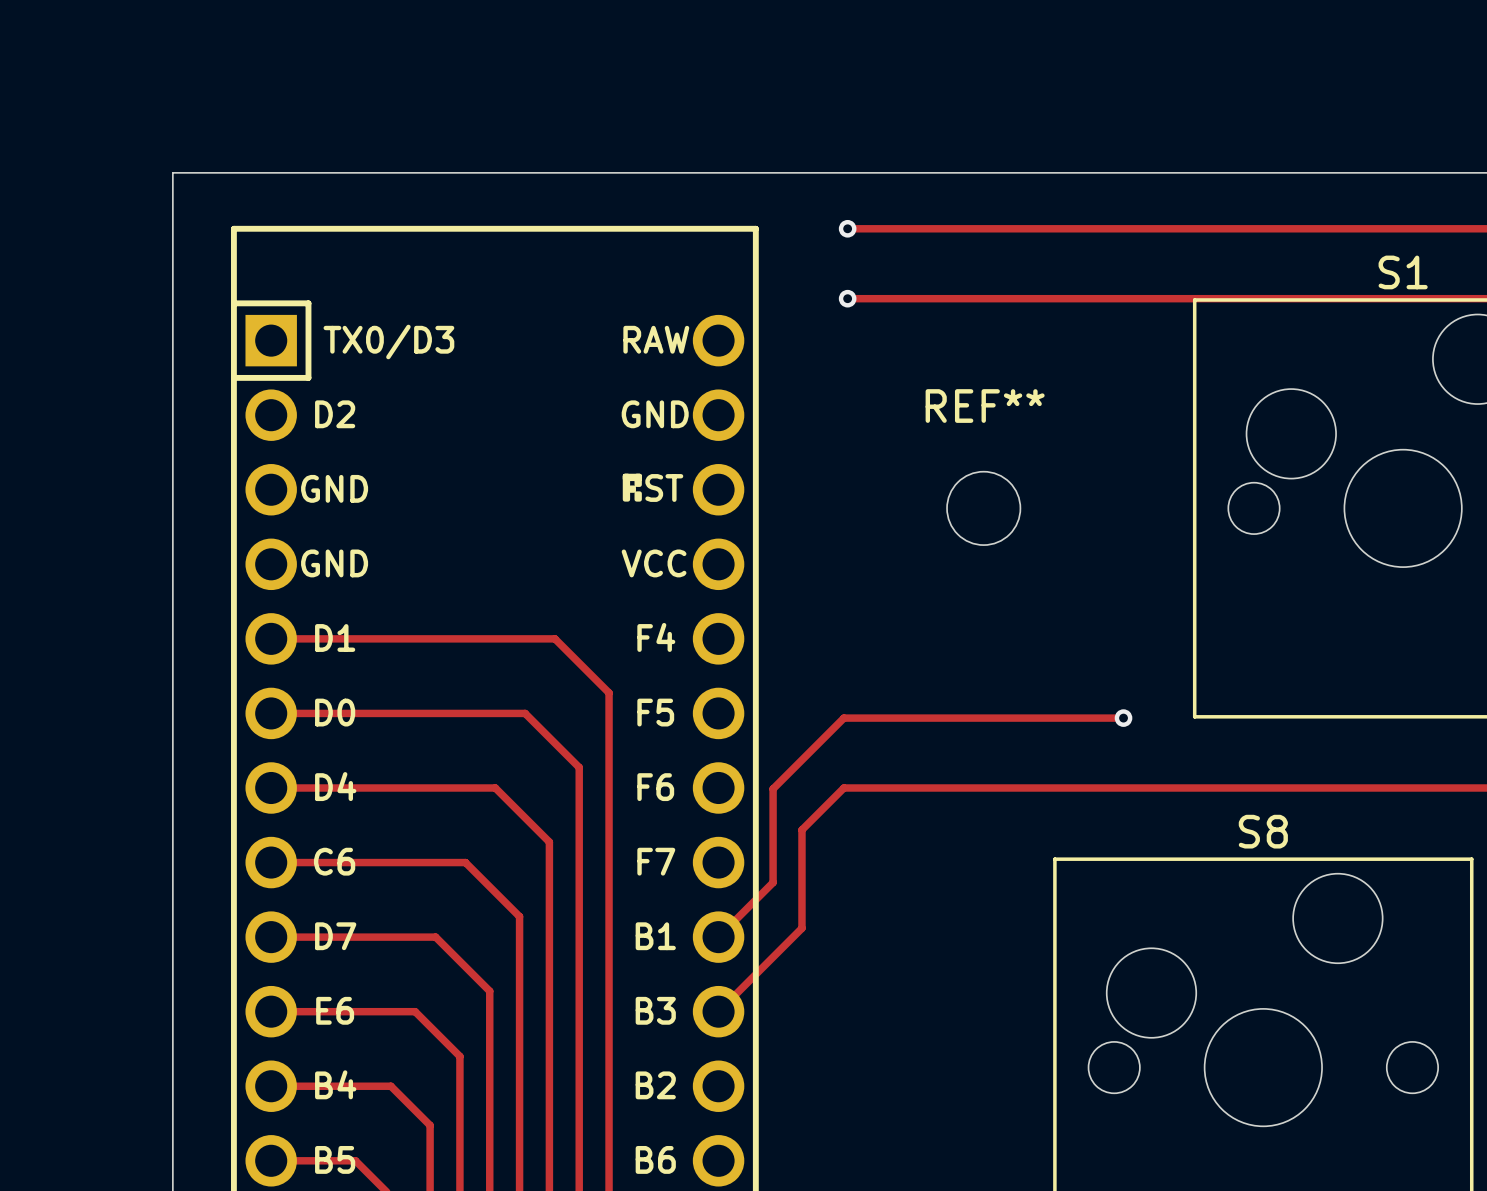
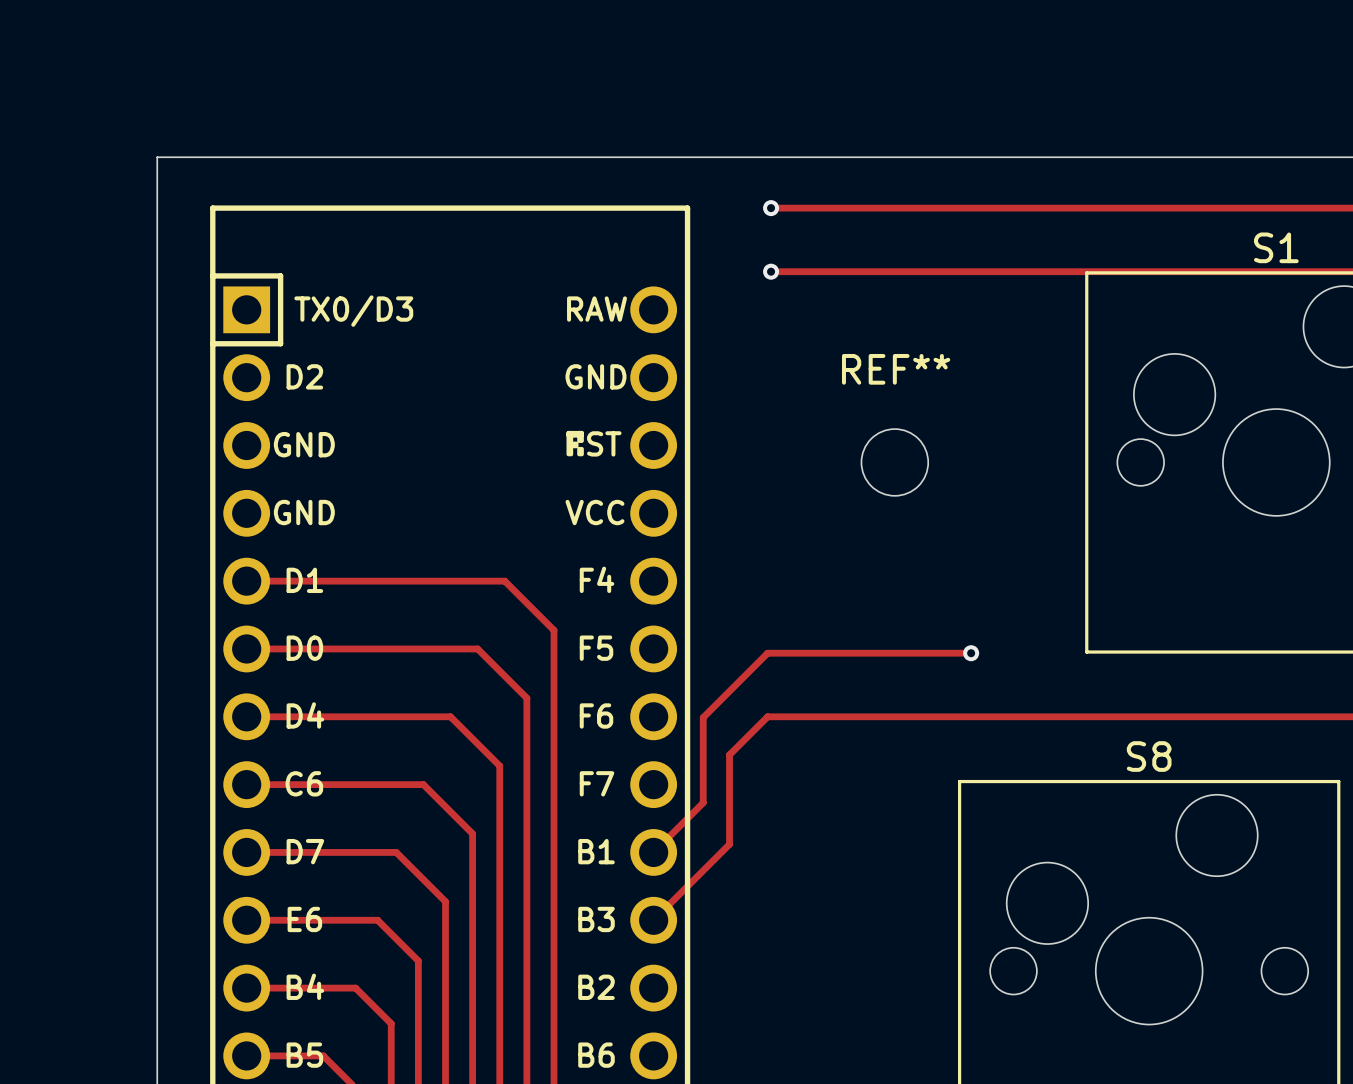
track: (1067, 718) (1123, 718) -> none
via position: (1123, 718) -> (971, 653)

